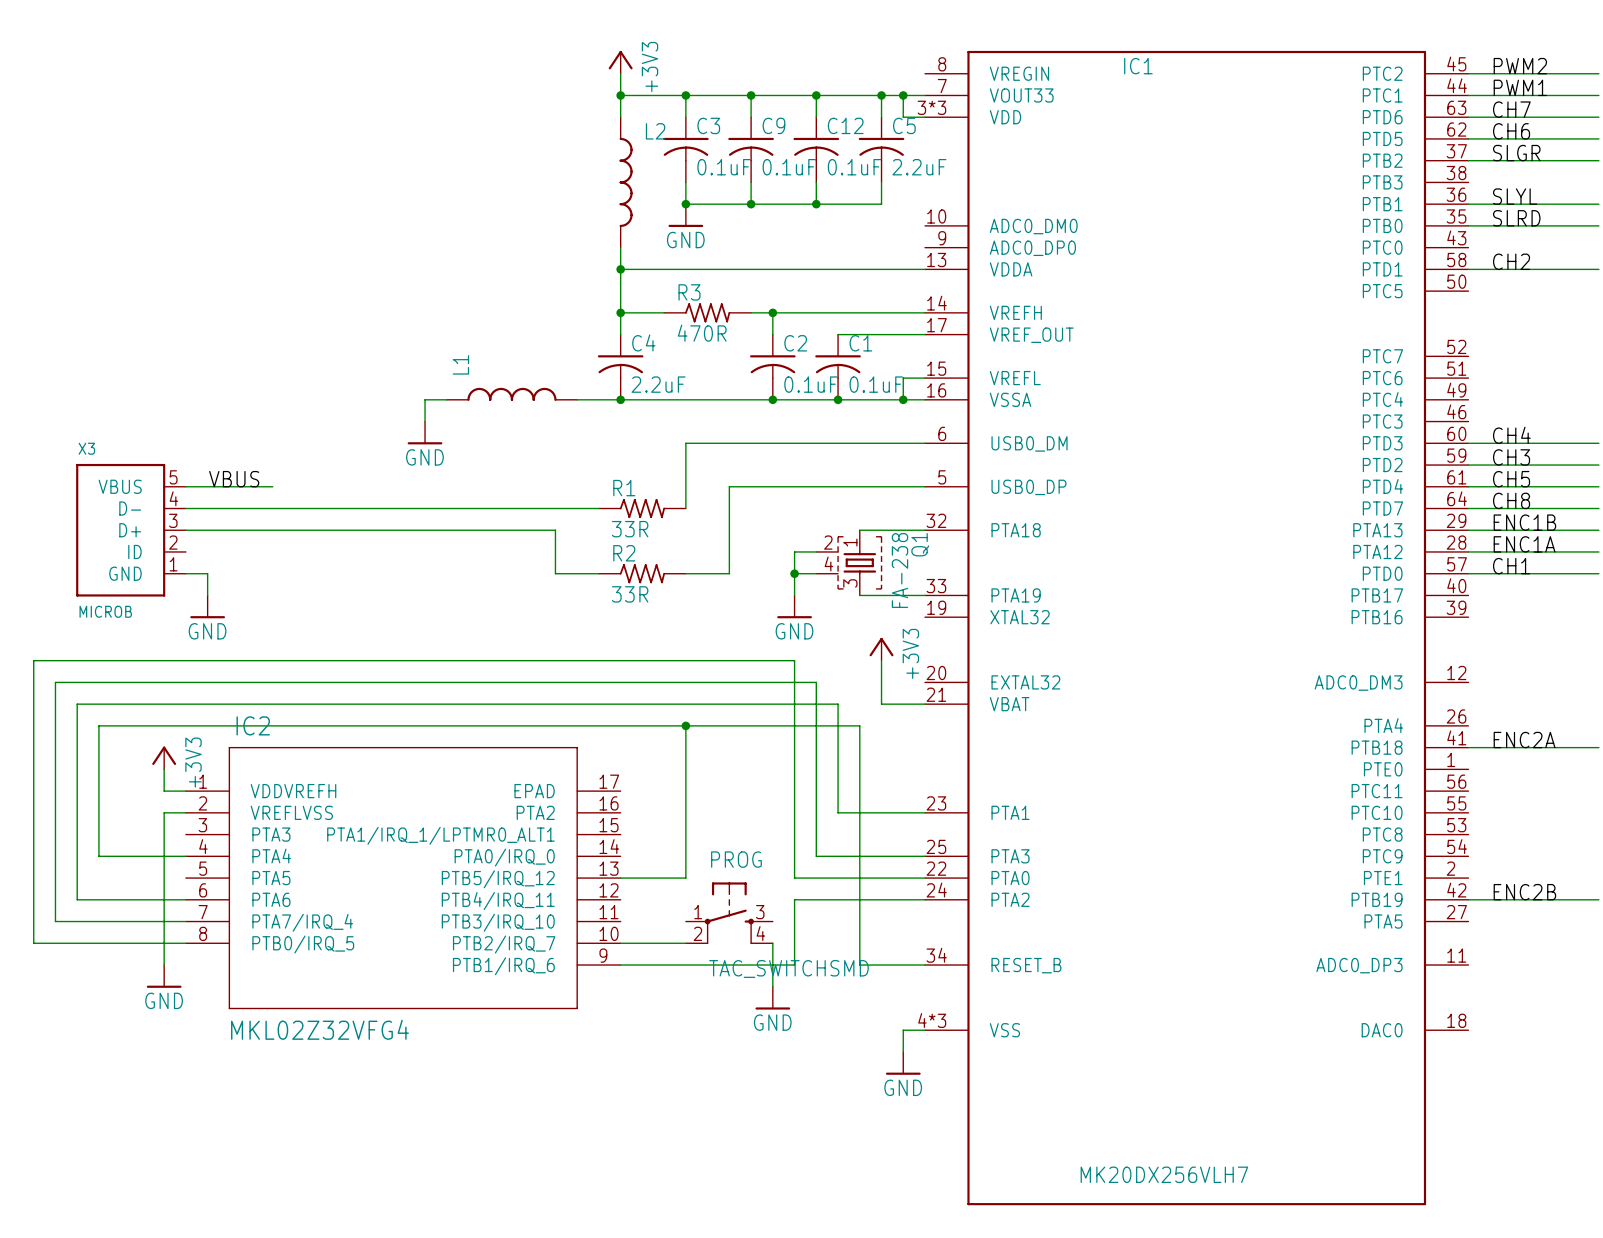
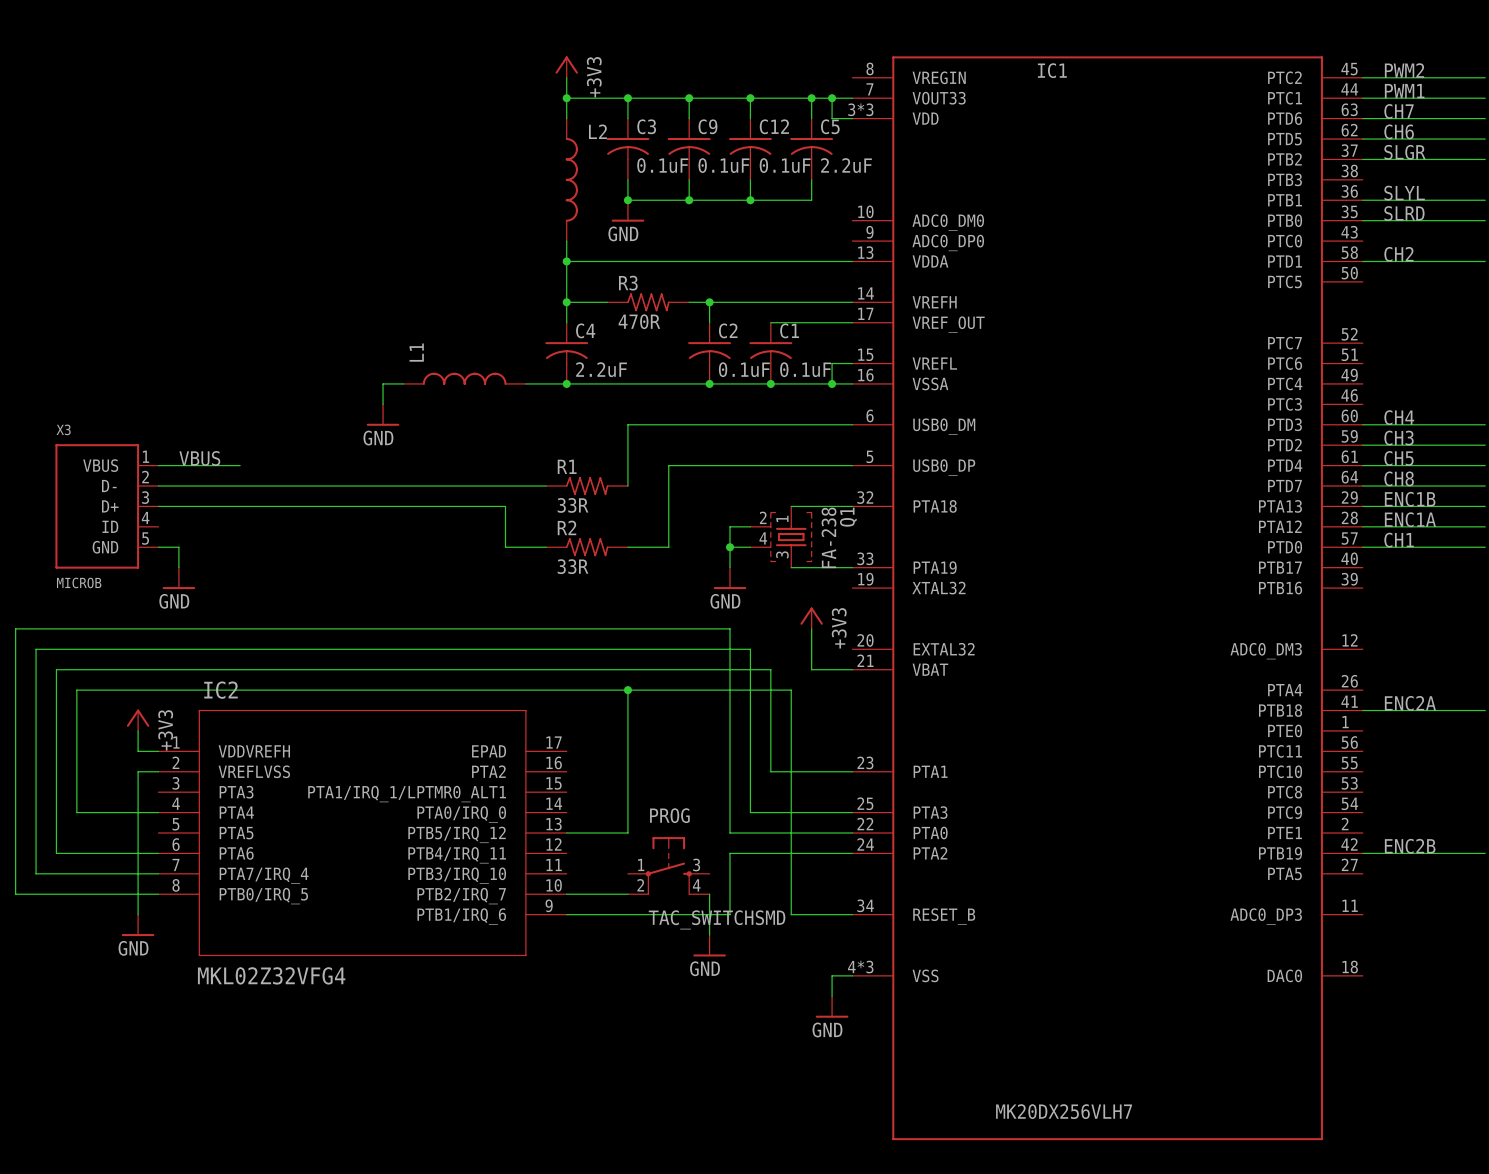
X3 pin number: 5 (173, 477) -> 1 (146, 456)
X3 pin number: 4 (173, 498) -> 2 (145, 477)
X3 pin number: 2 (173, 542) -> 4 (145, 517)
X3 pin number: 1 (173, 564) -> 5 (145, 538)

